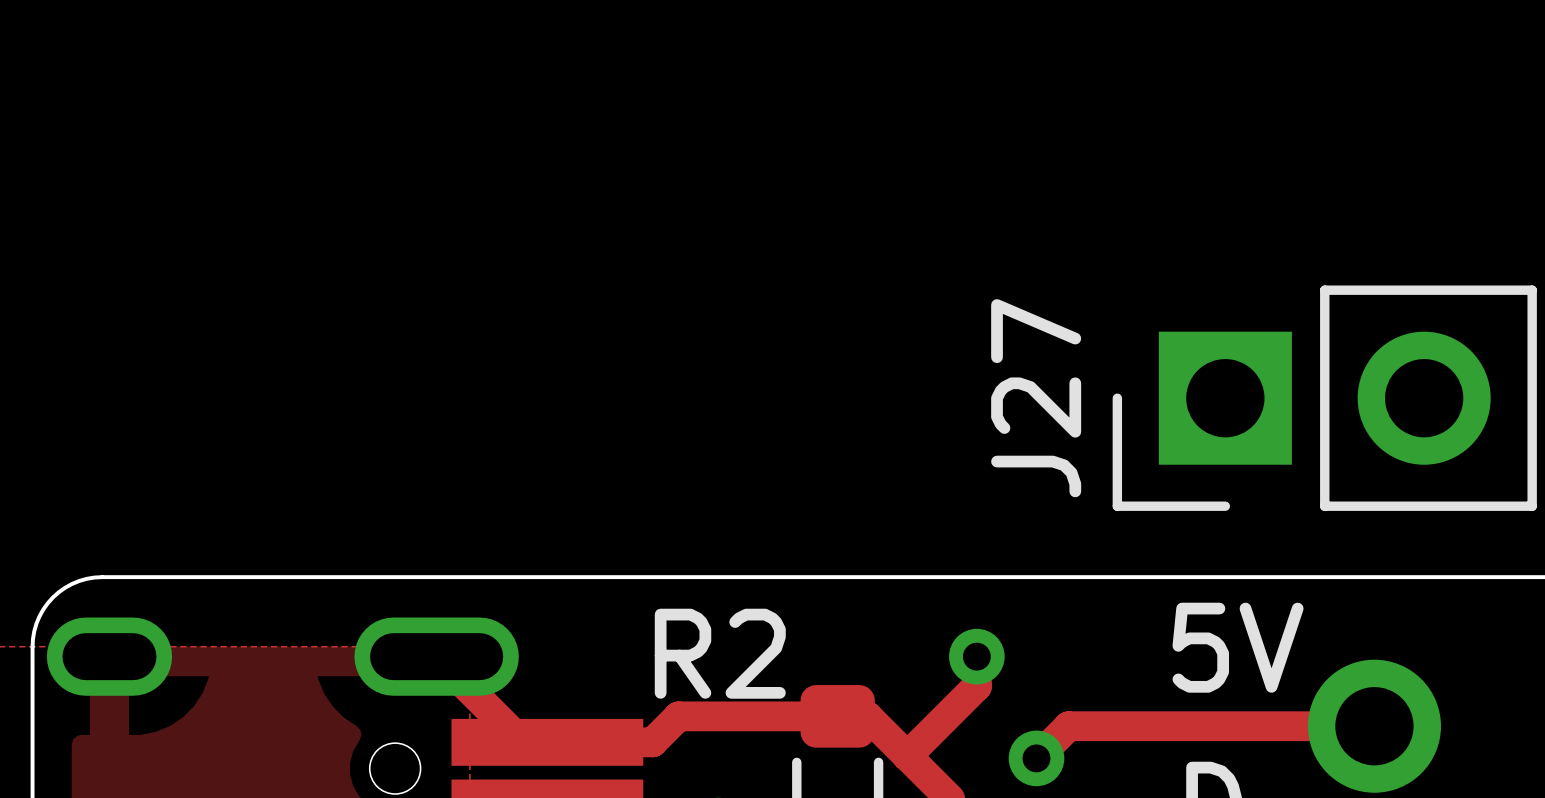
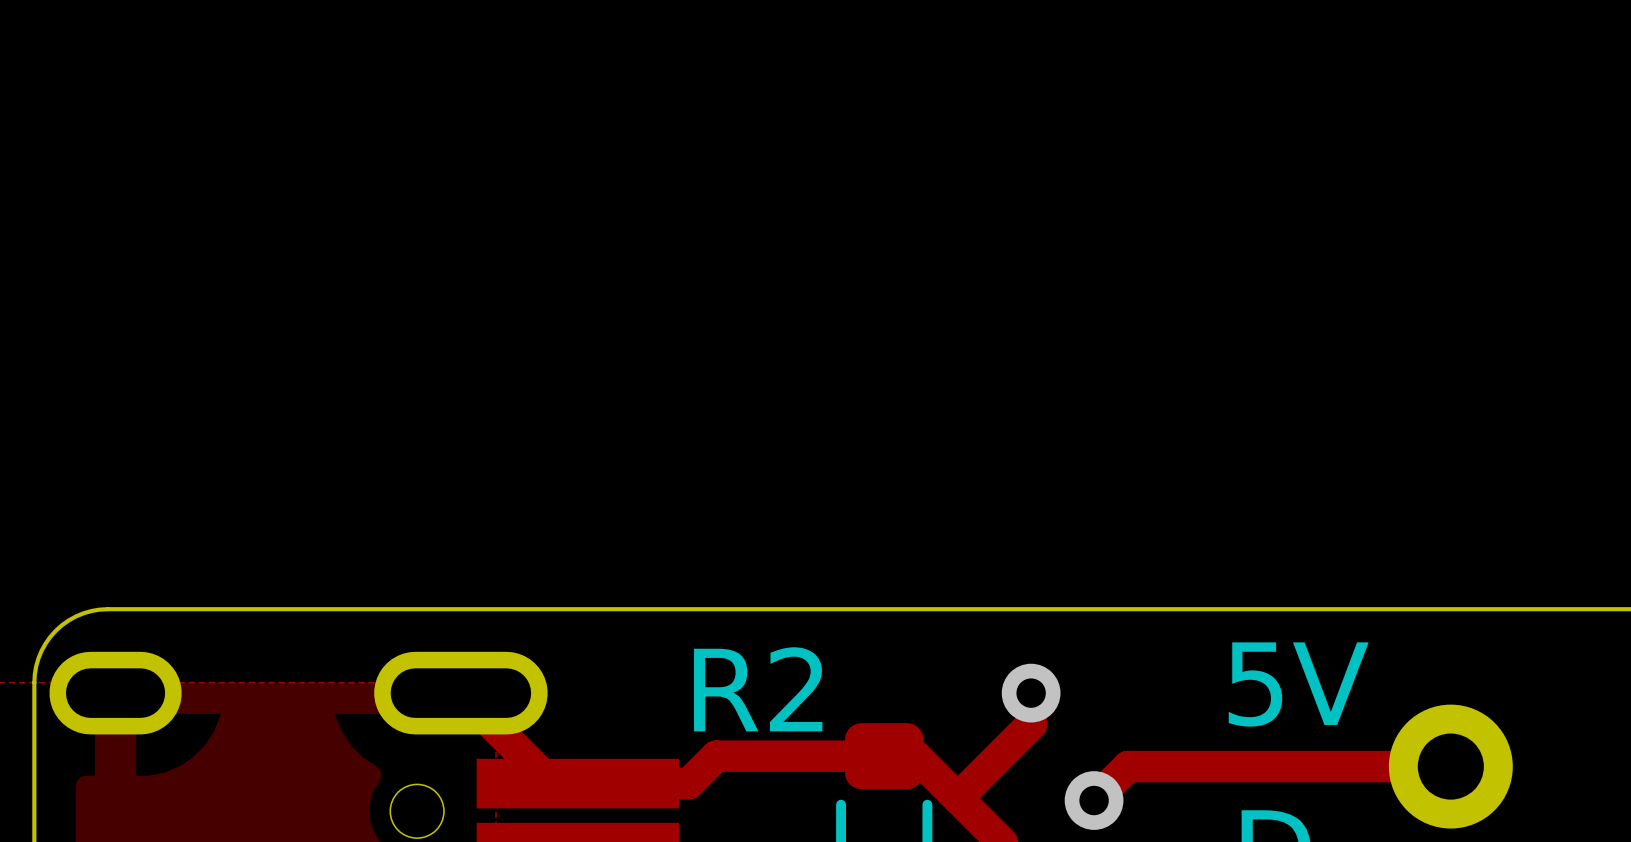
J27: (1324, 398) -> none
part footprint: [1307, 659, 1441, 793] -> [1388, 704, 1513, 829]

